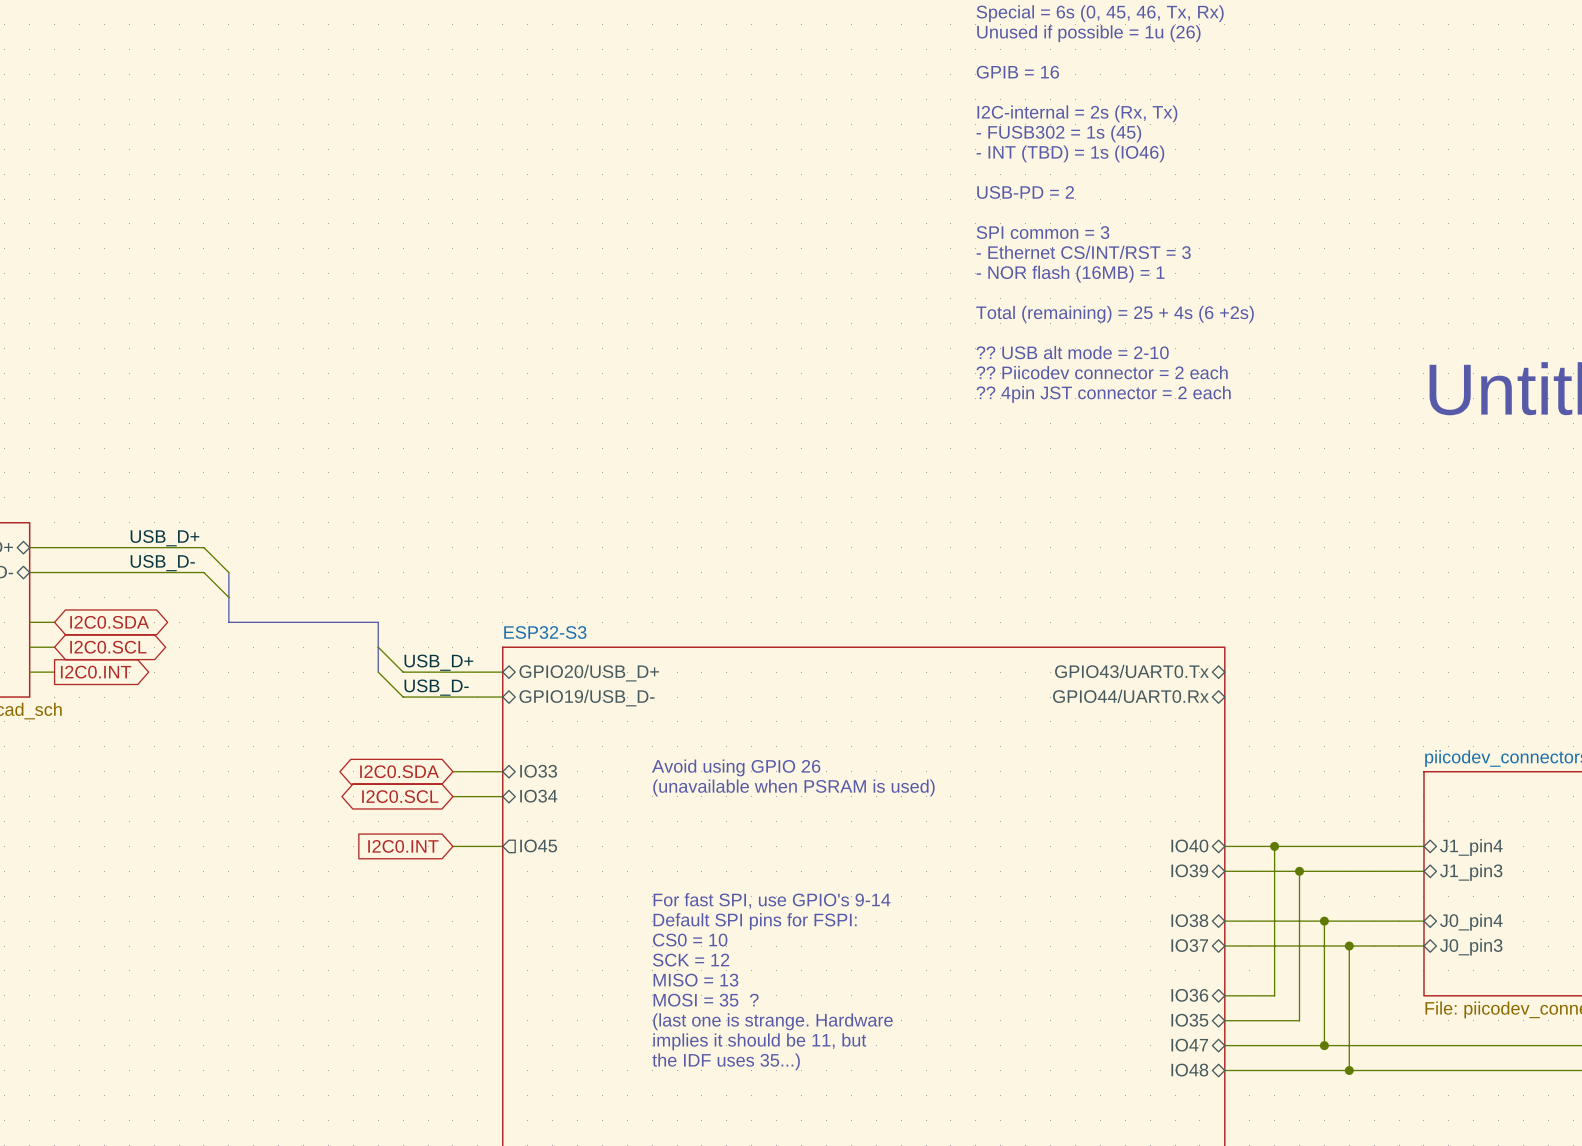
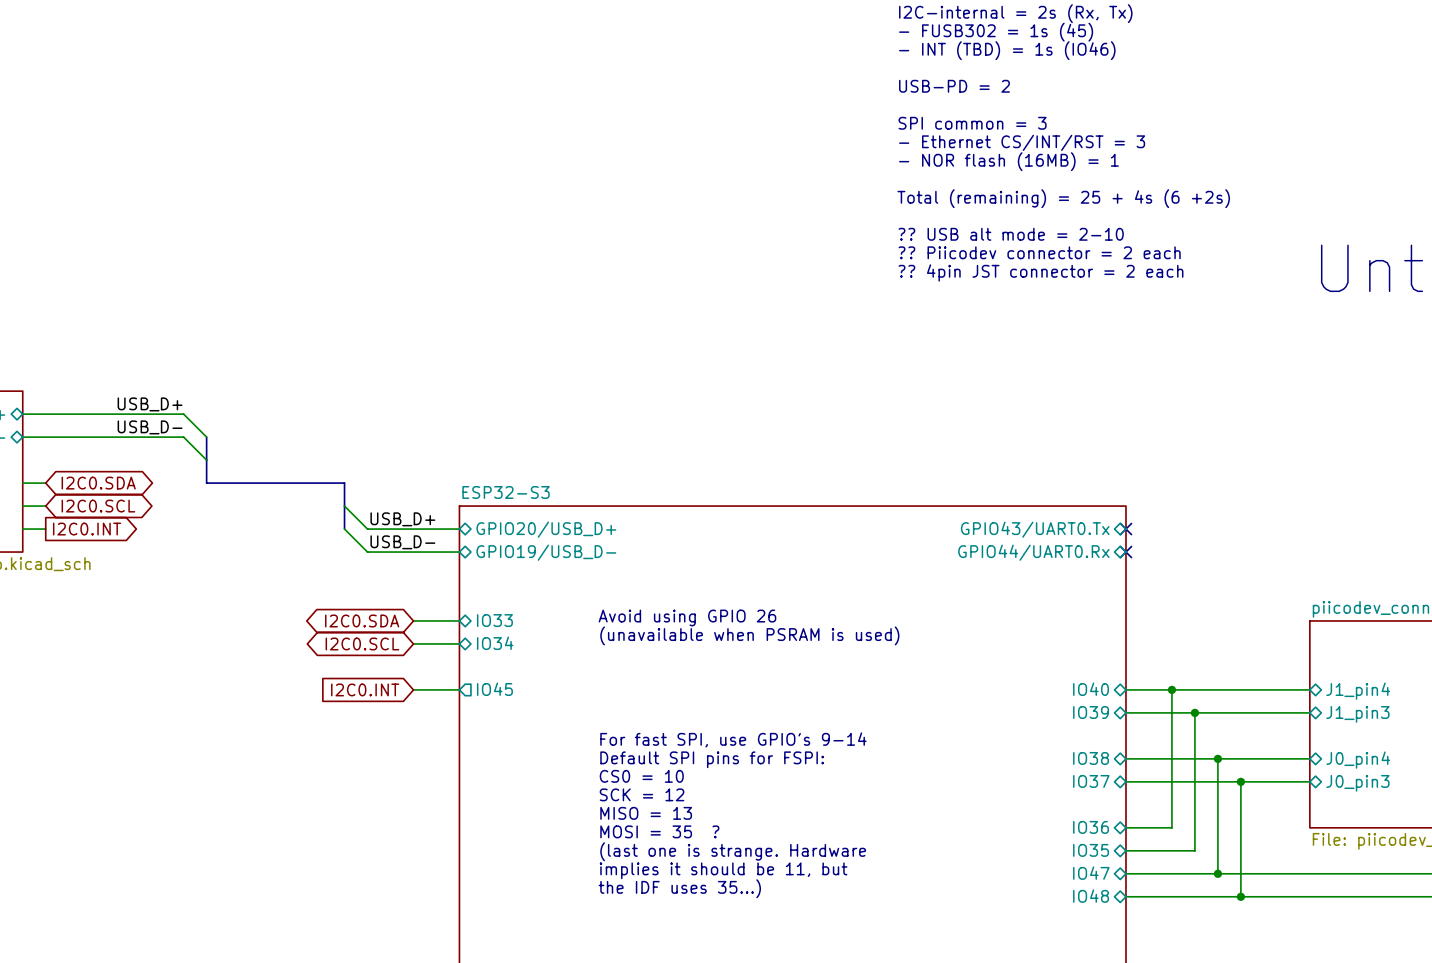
no-connect mark: none -> (1125, 529)
no-connect mark: none -> (1125, 552)

